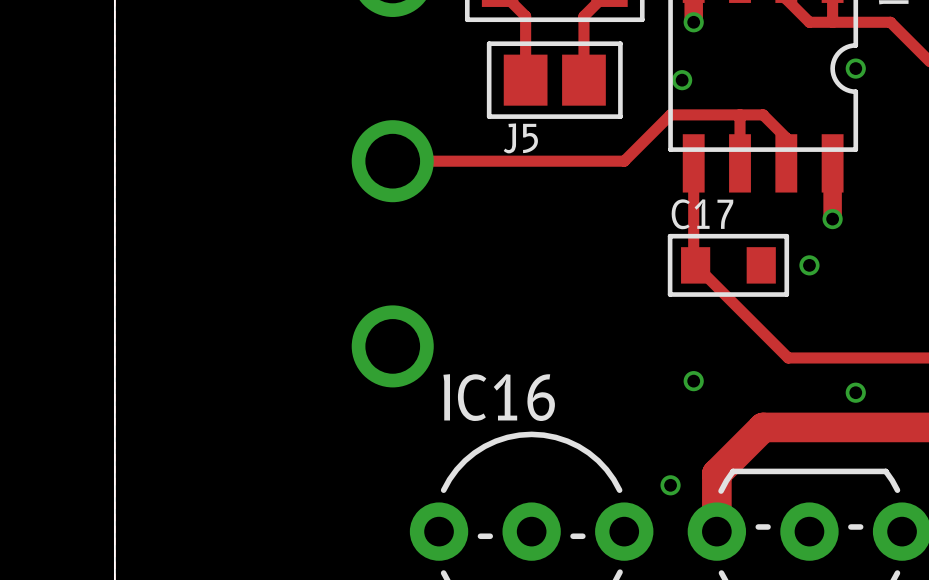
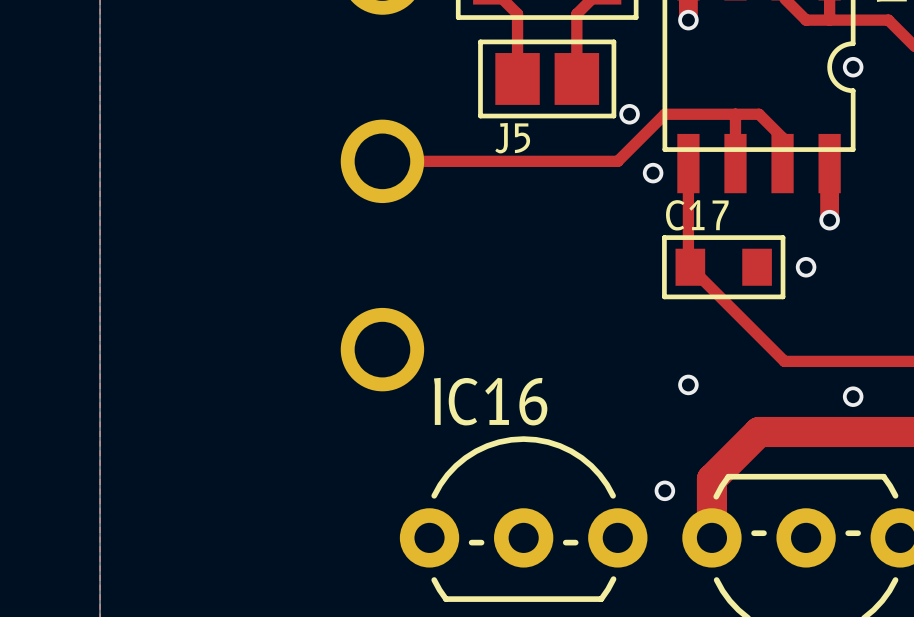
via: (682, 80) -> none
via: none -> (629, 114)
via: none -> (653, 173)

